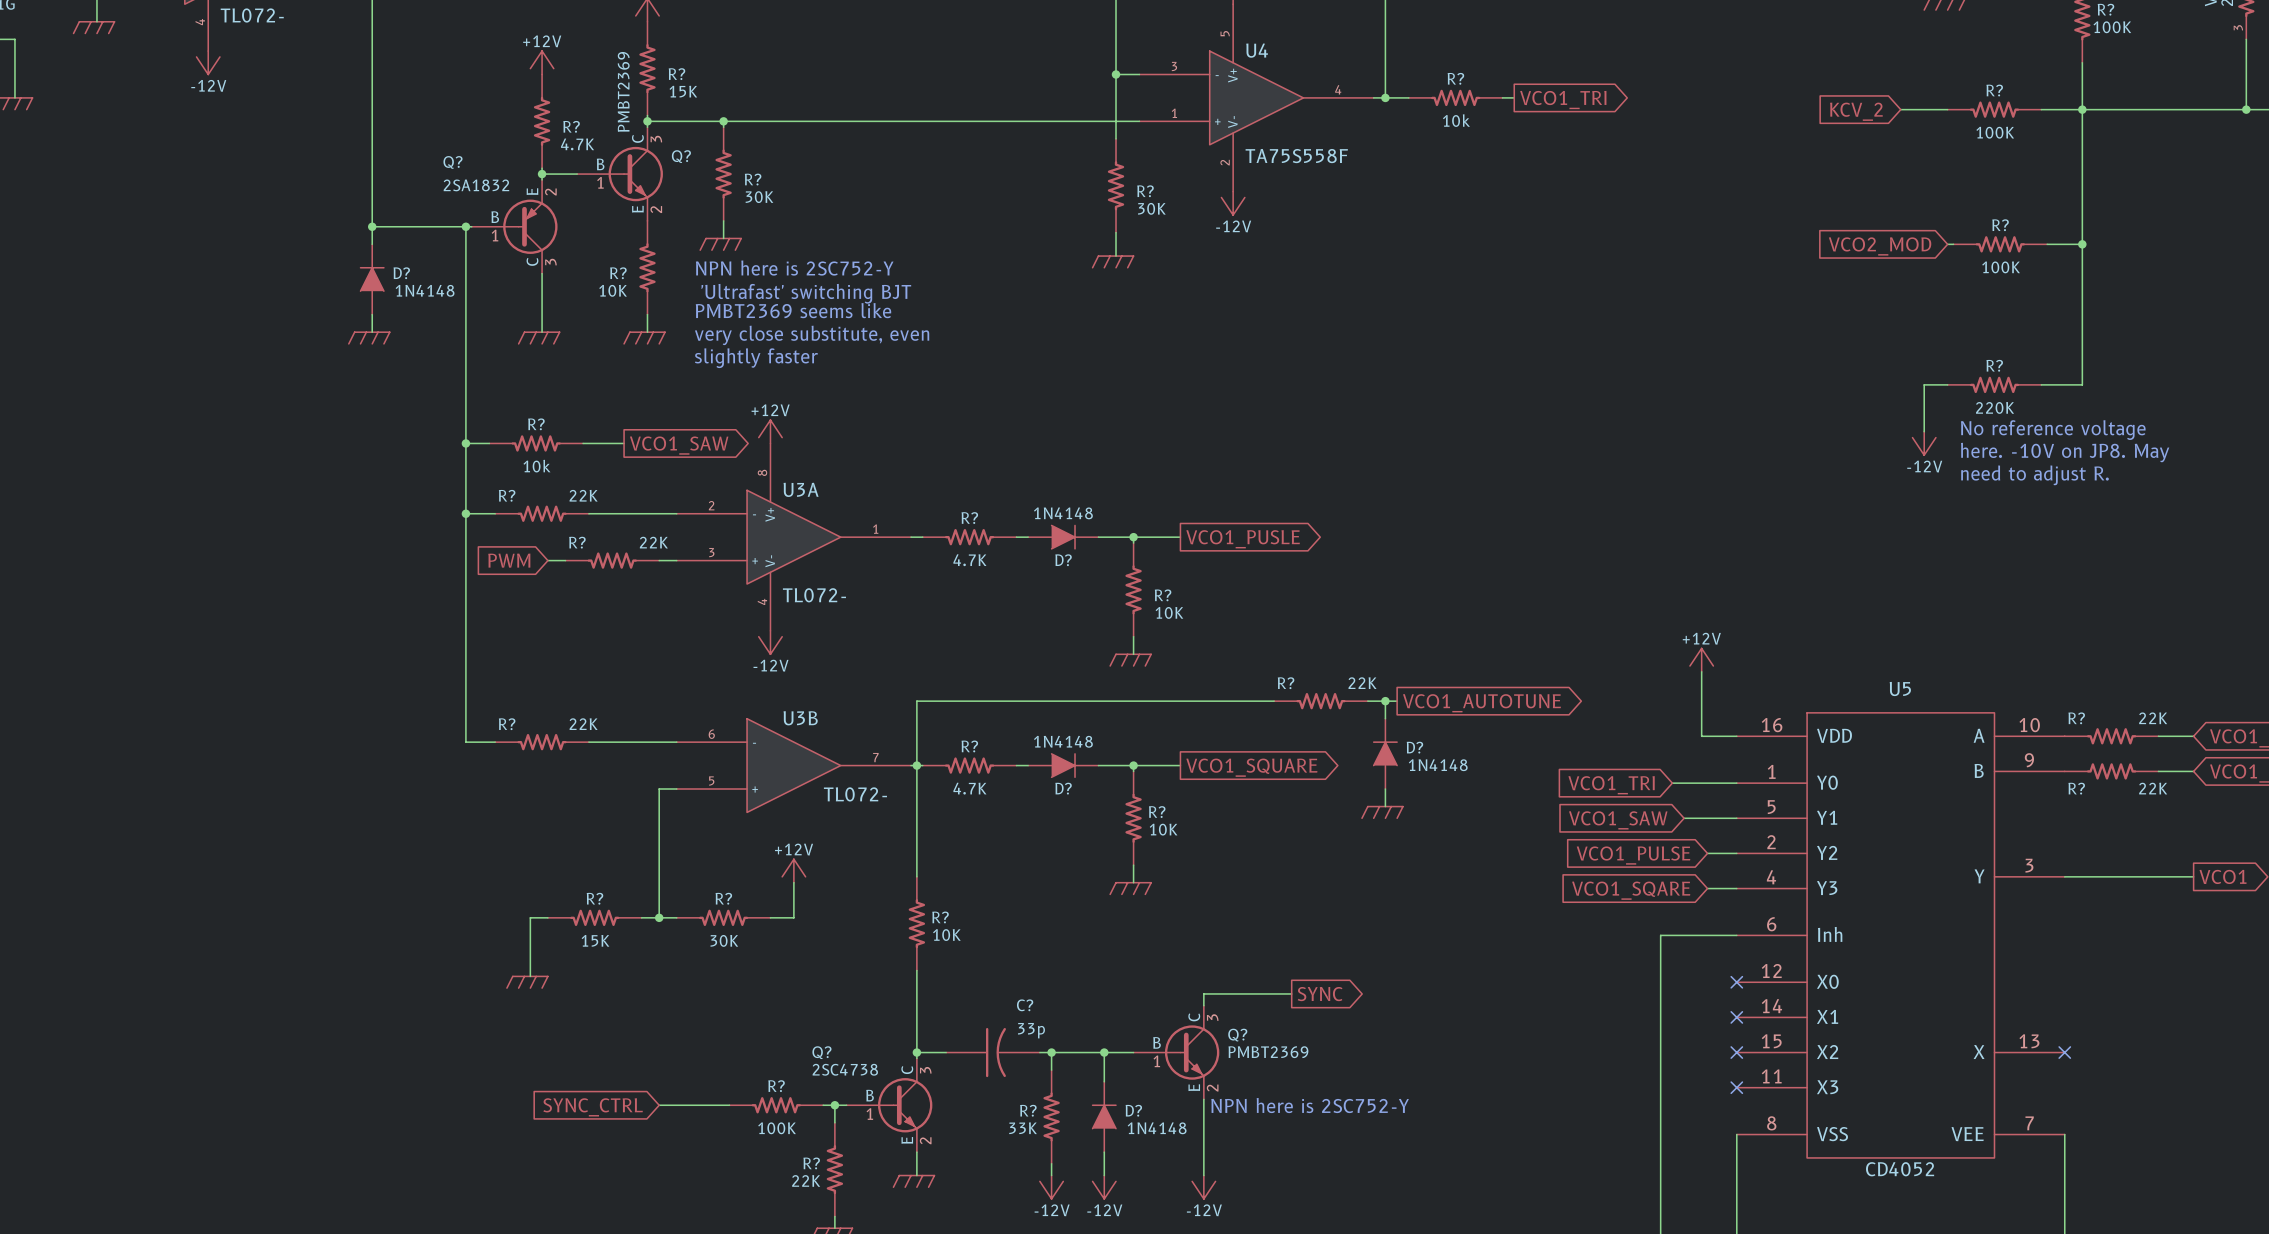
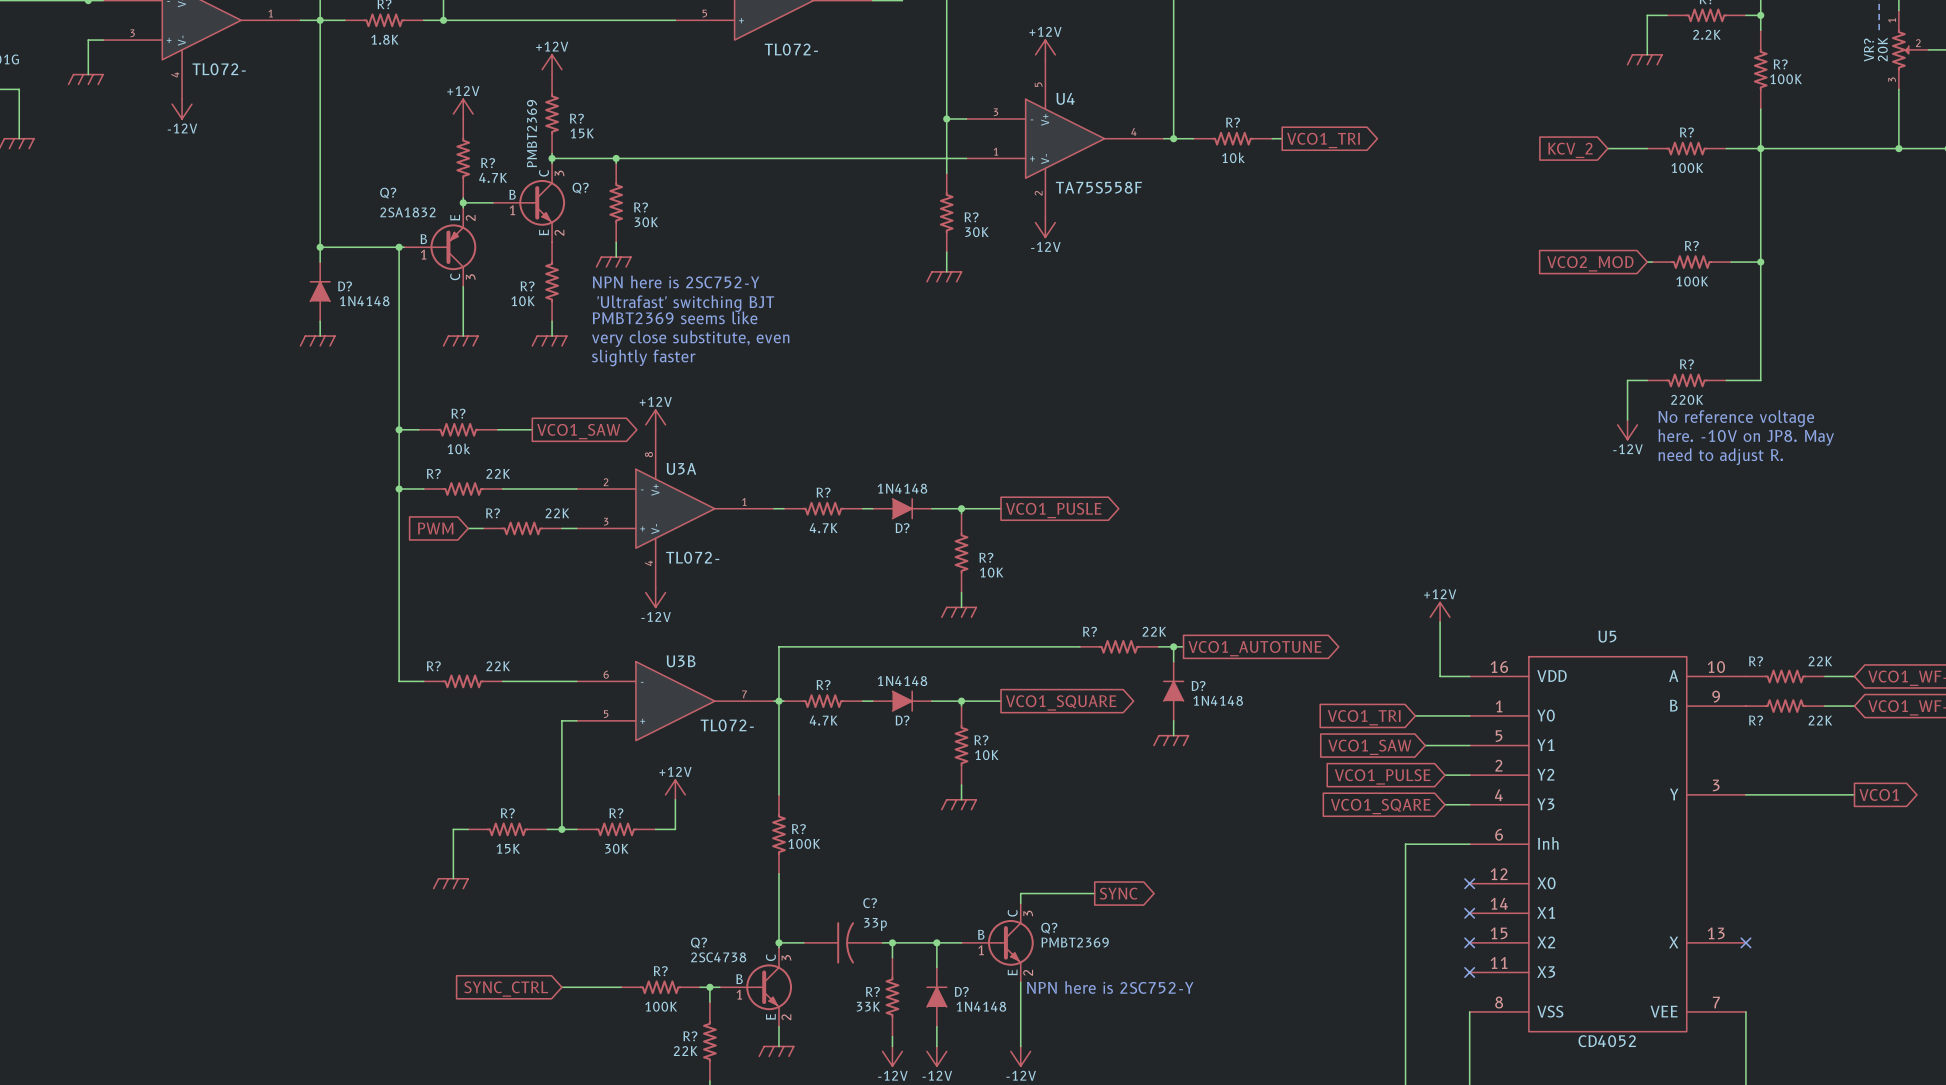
R? value: 10K (946, 935) -> 100K (804, 843)

